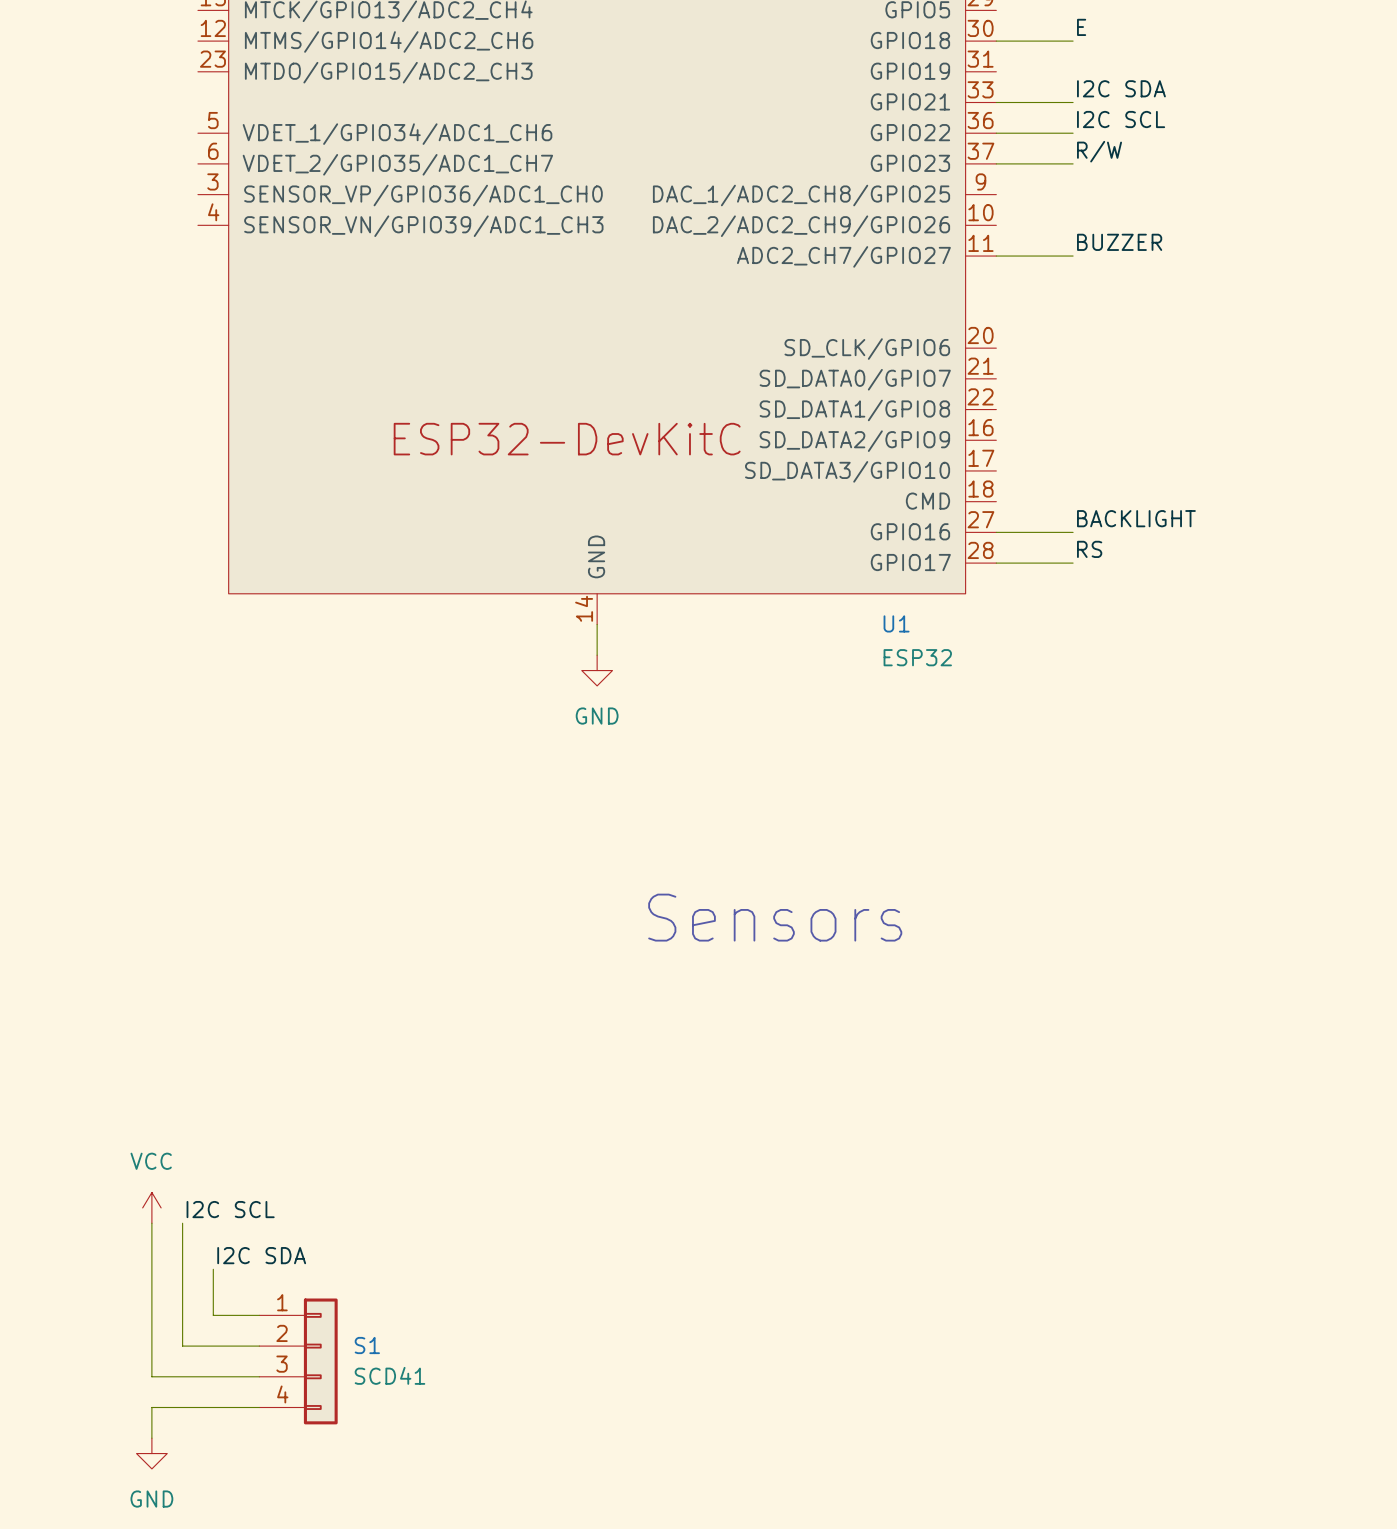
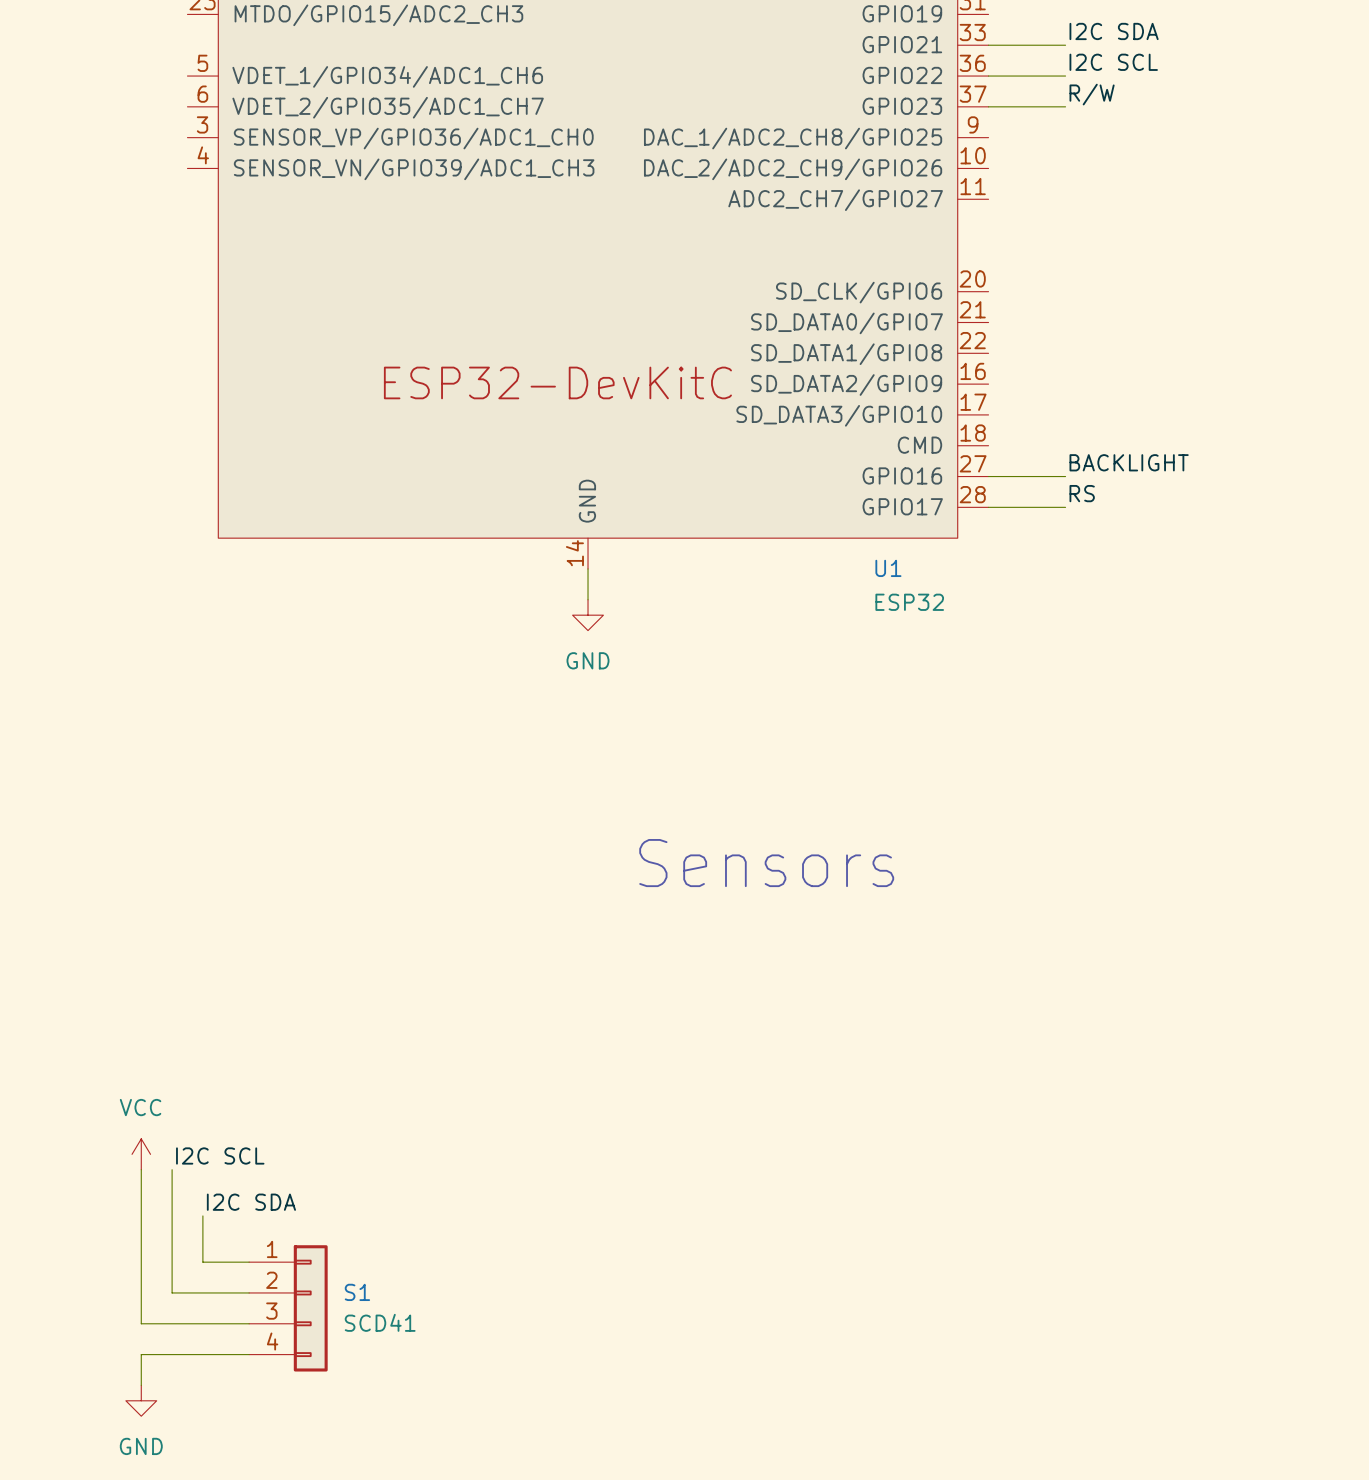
label: BUZZER (1119, 242) -> none
wire: (996, 256) (1073, 256) -> none

